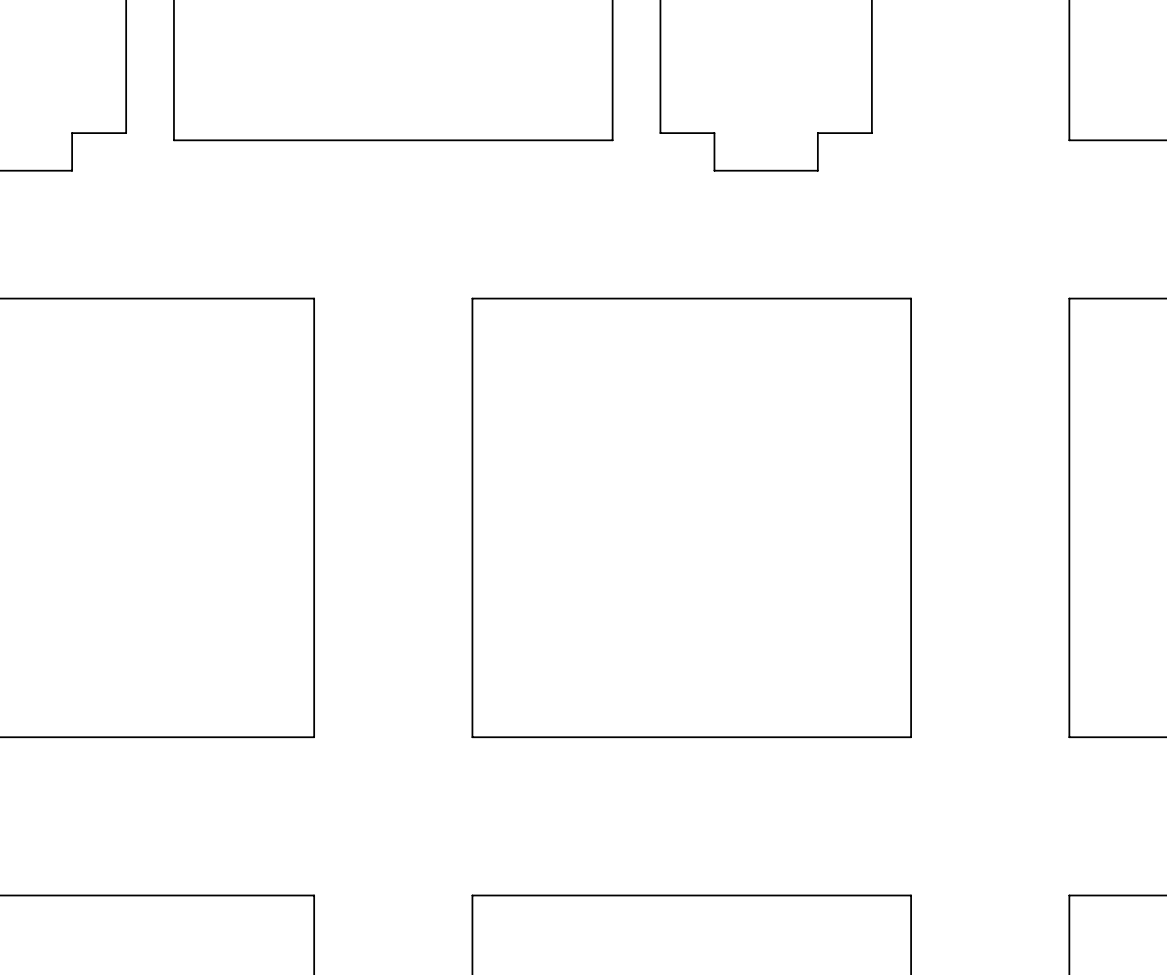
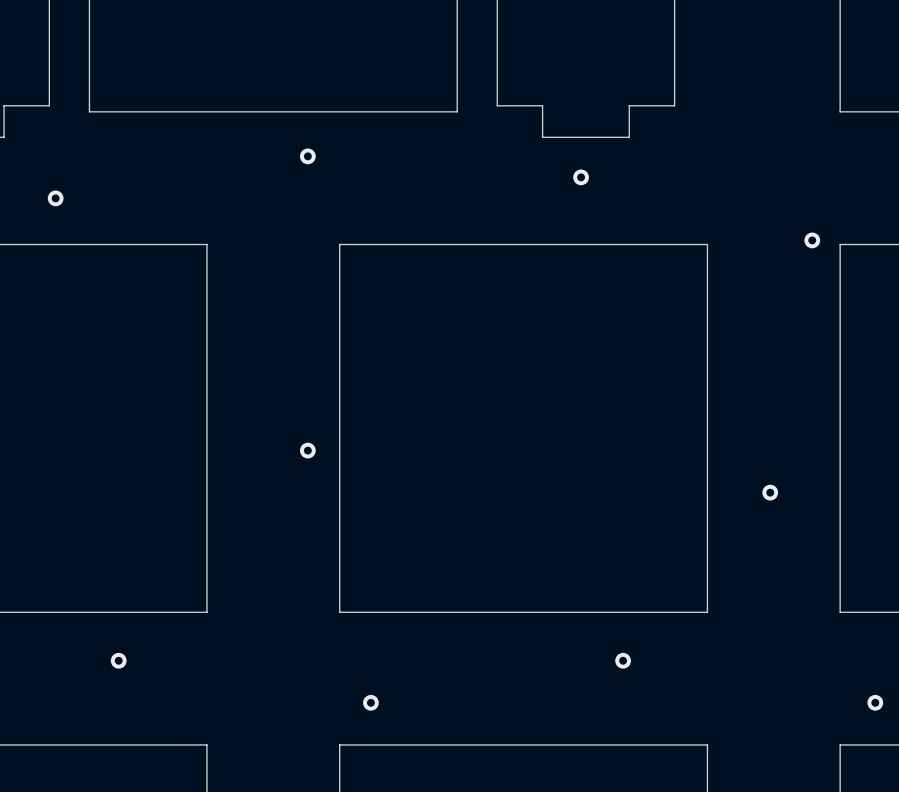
via: none -> (307, 156)
via: none -> (581, 177)
via: none -> (55, 198)
via: none -> (812, 240)
via: none -> (307, 450)
via: none -> (770, 492)
via: none -> (118, 660)
via: none -> (623, 660)
via: none -> (370, 702)
via: none -> (875, 702)

